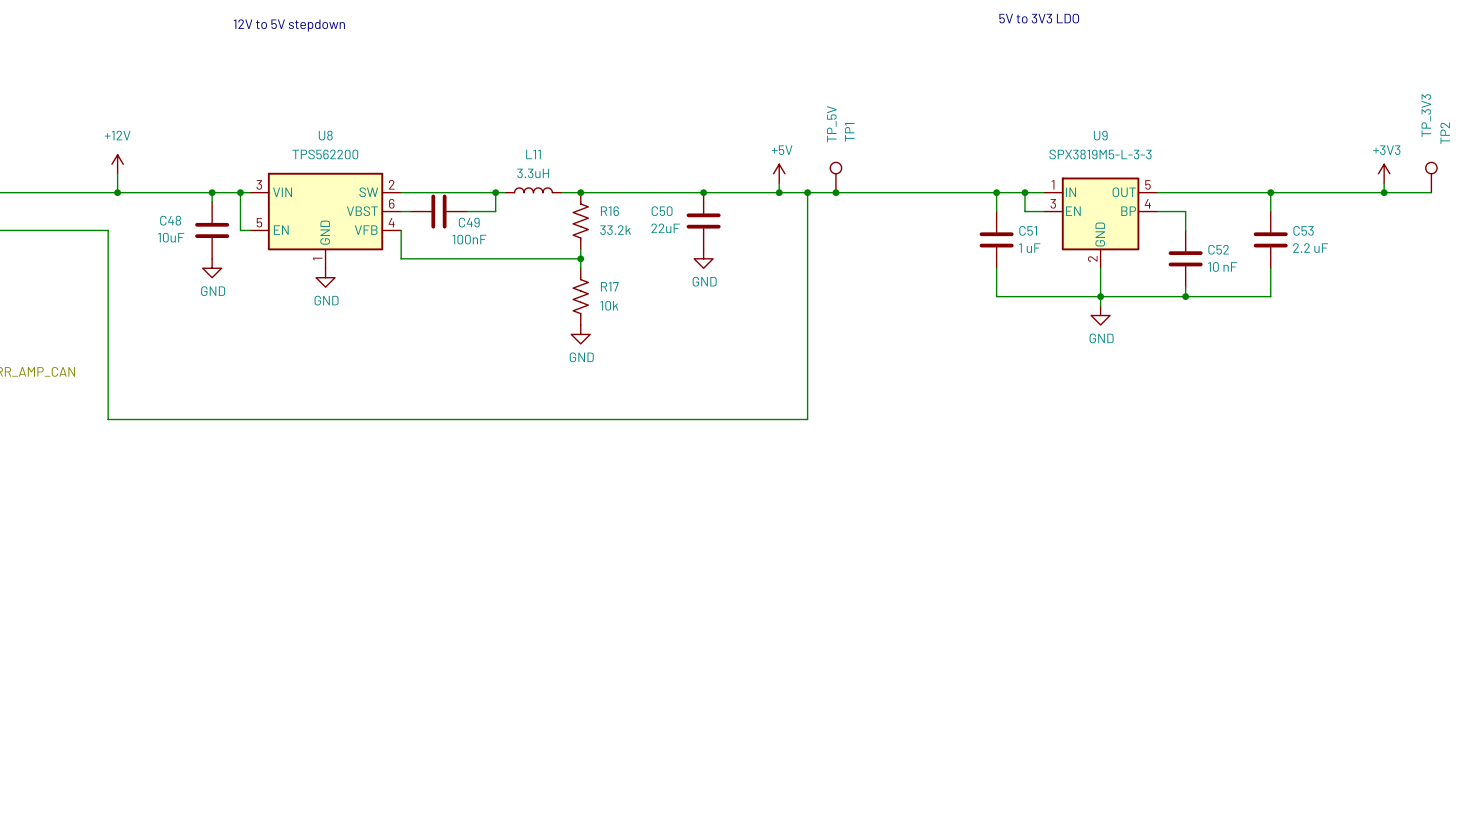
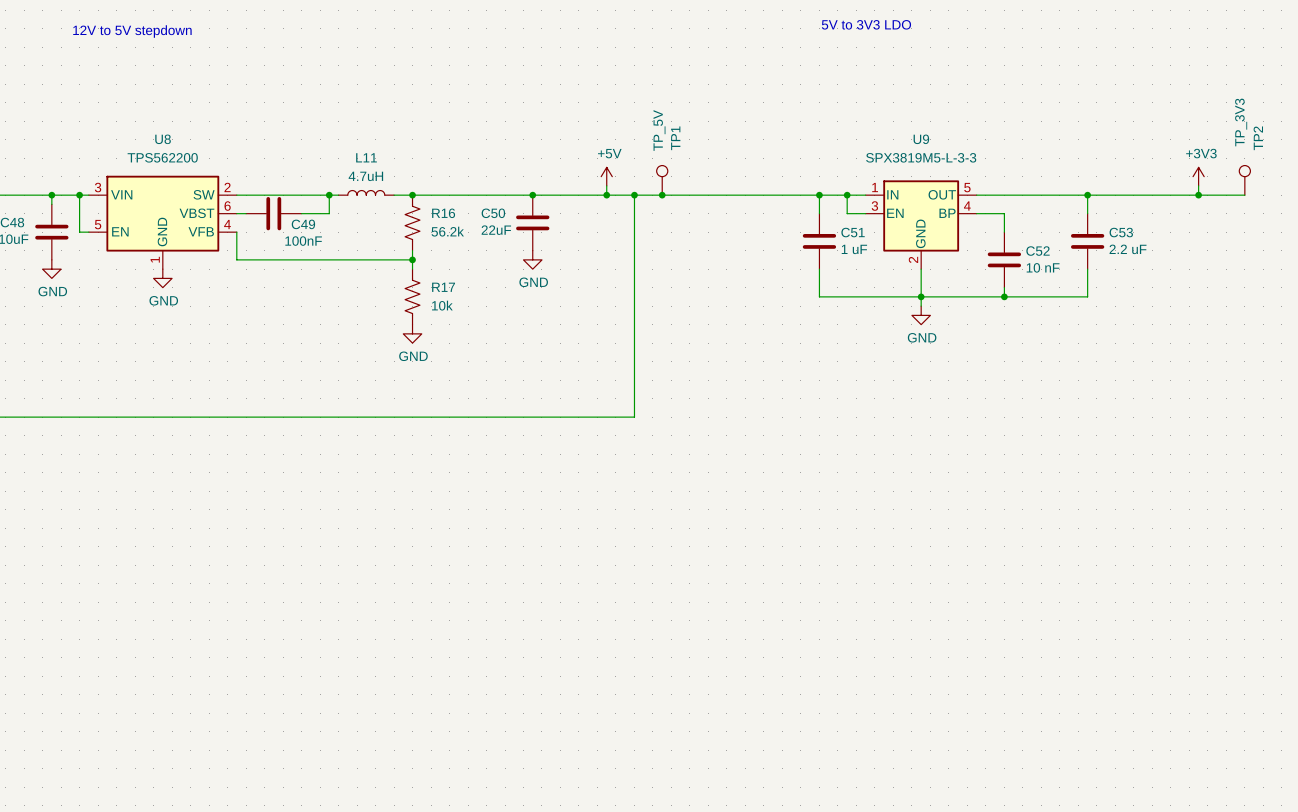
L11 value: 3.3uH (533, 173) -> 4.7uH (365, 176)
R16 value: 33.2k (615, 230) -> 56.2k (447, 231)

